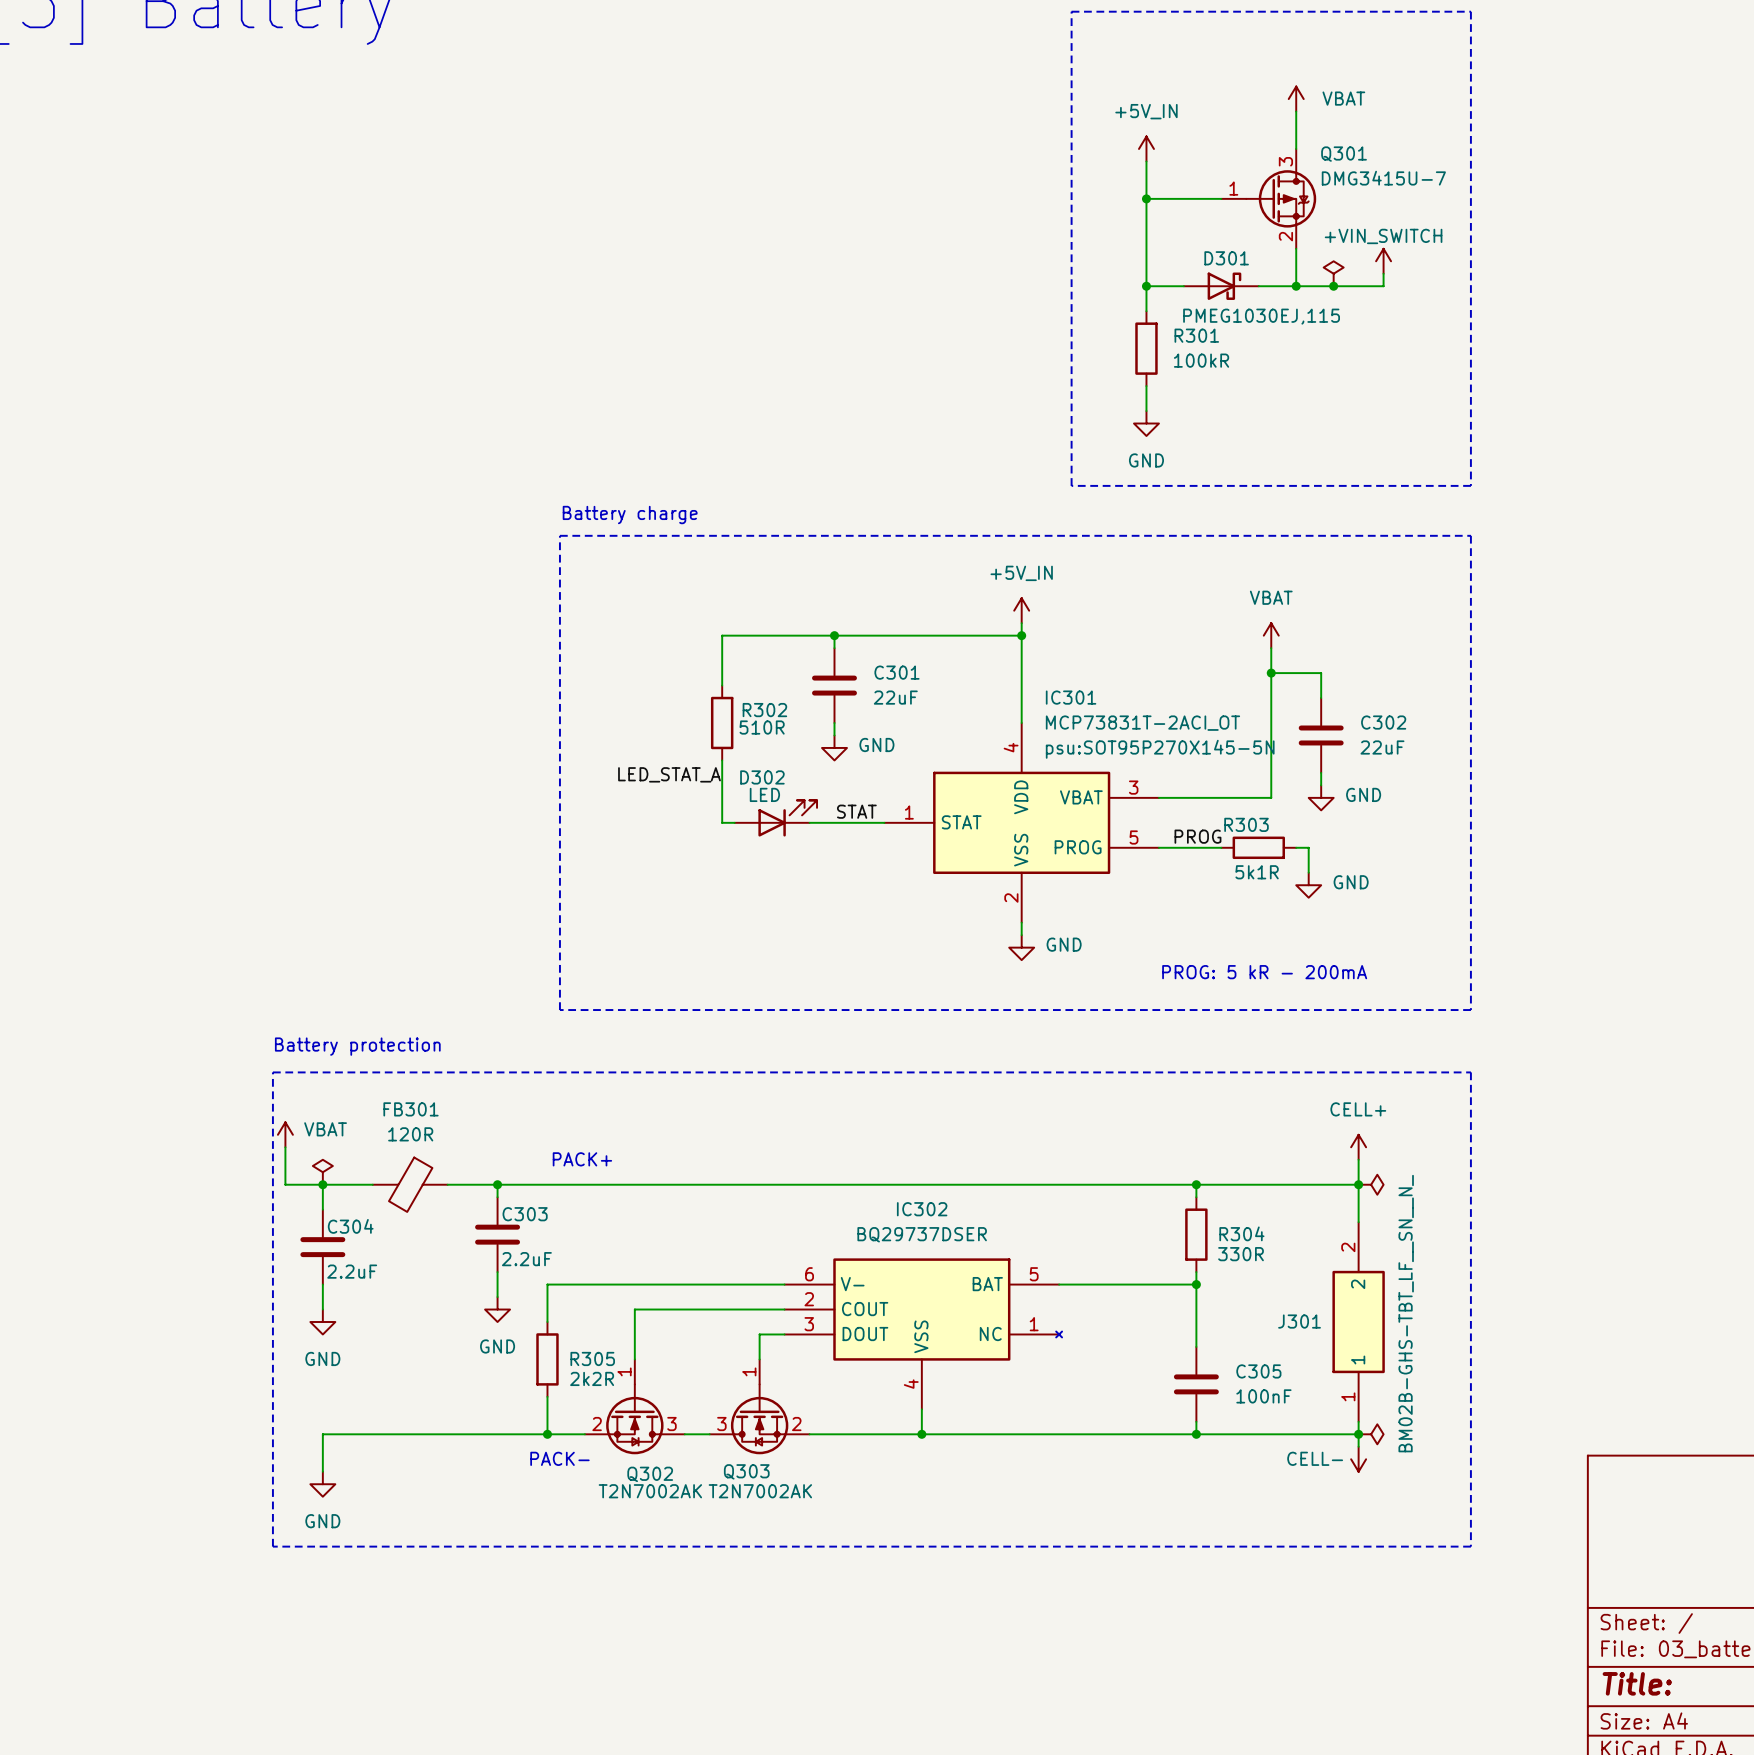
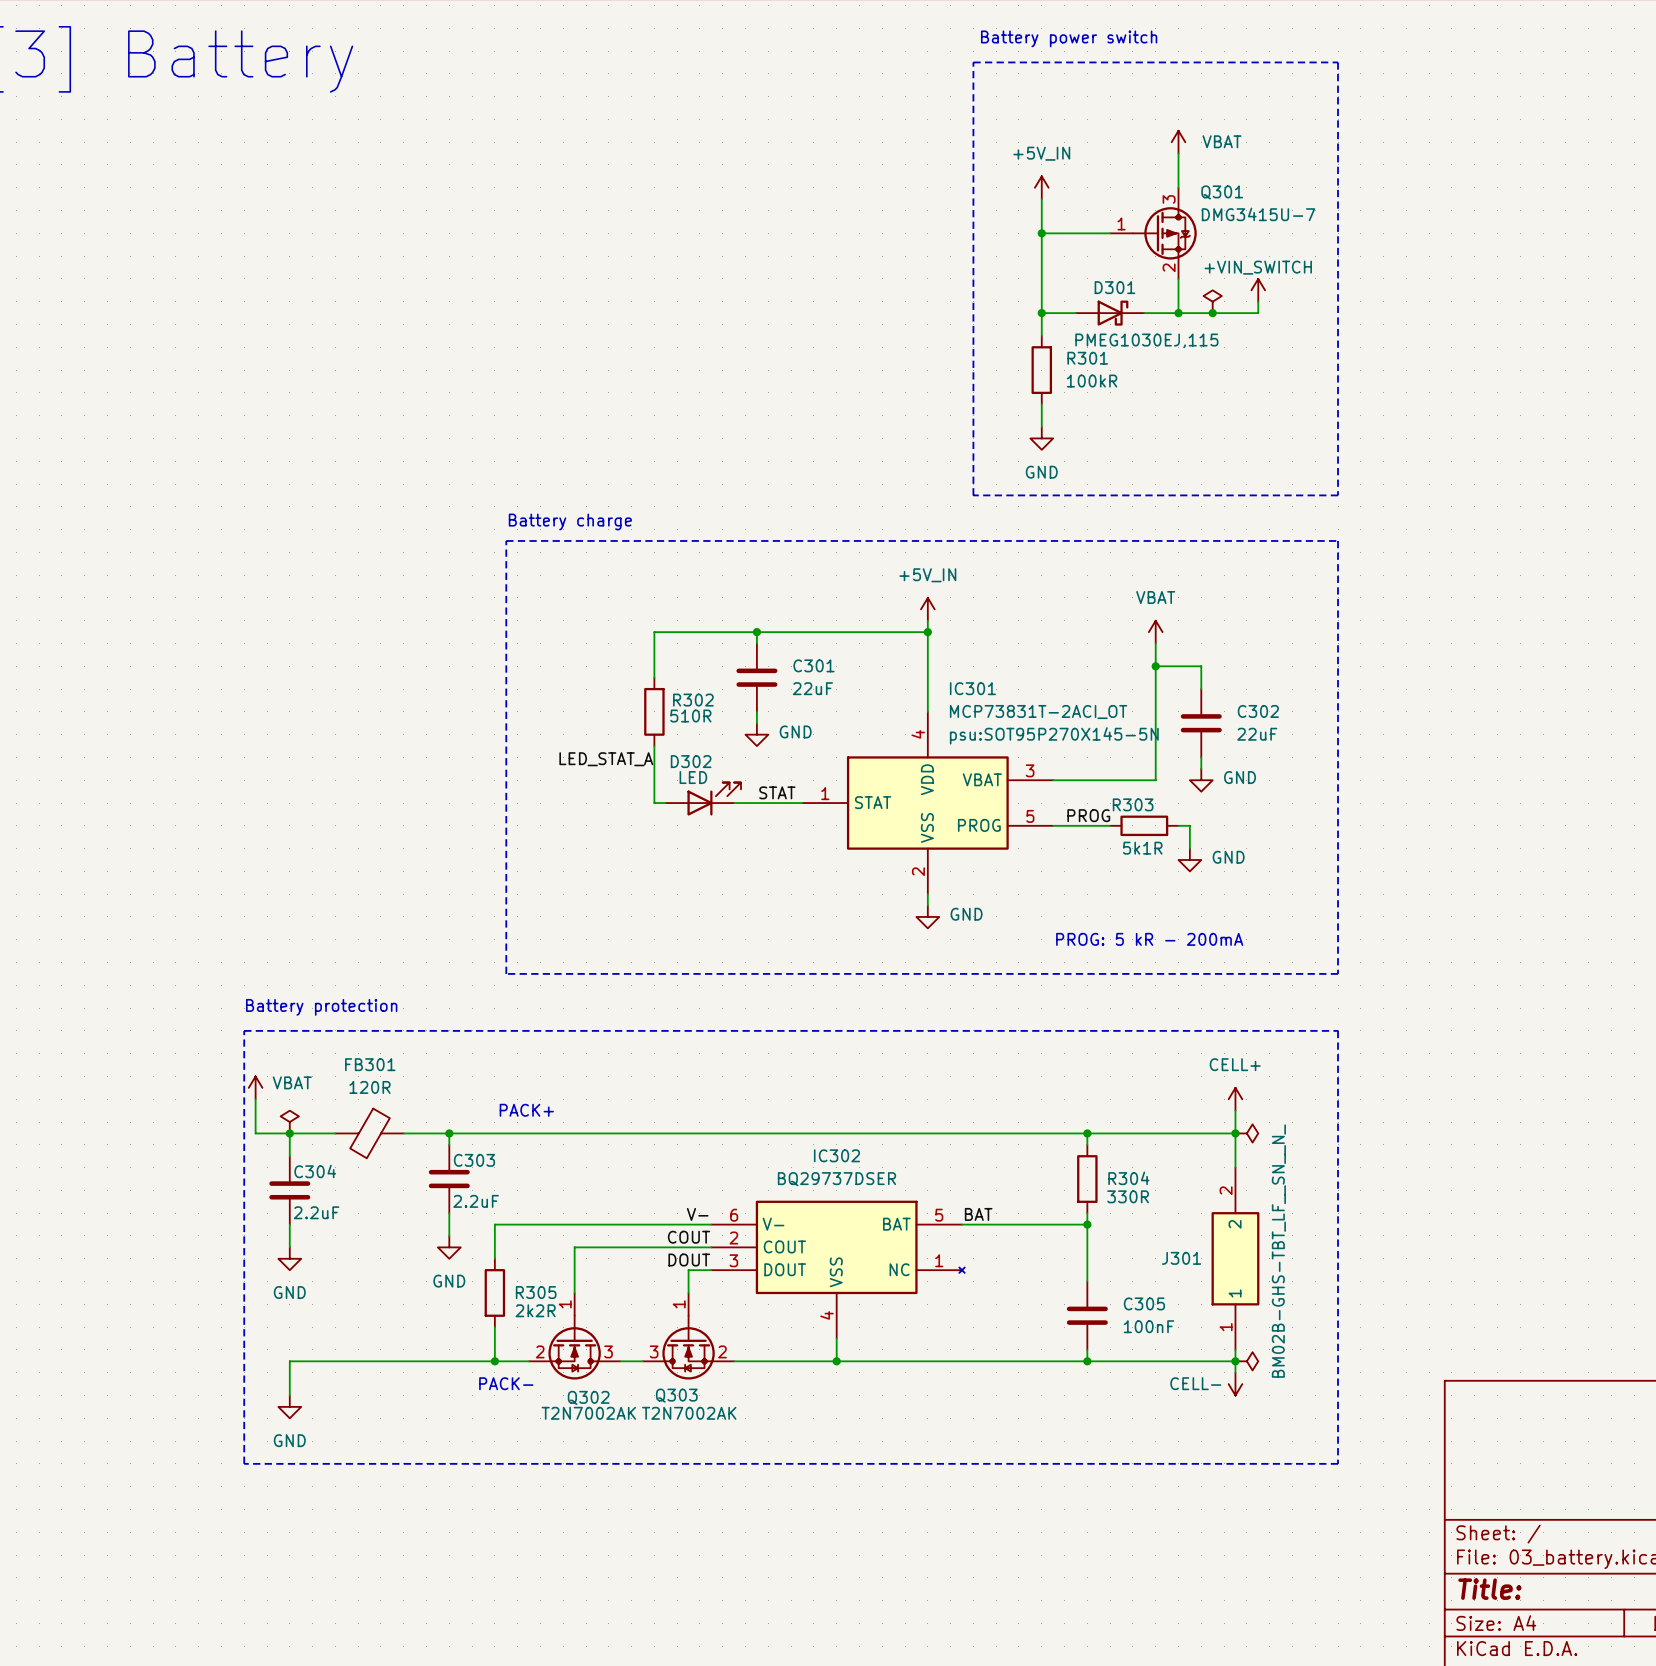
label: none -> V- (697, 1214)
label: none -> BAT (978, 1214)
label: none -> COUT (689, 1237)
label: none -> DOUT (689, 1260)

